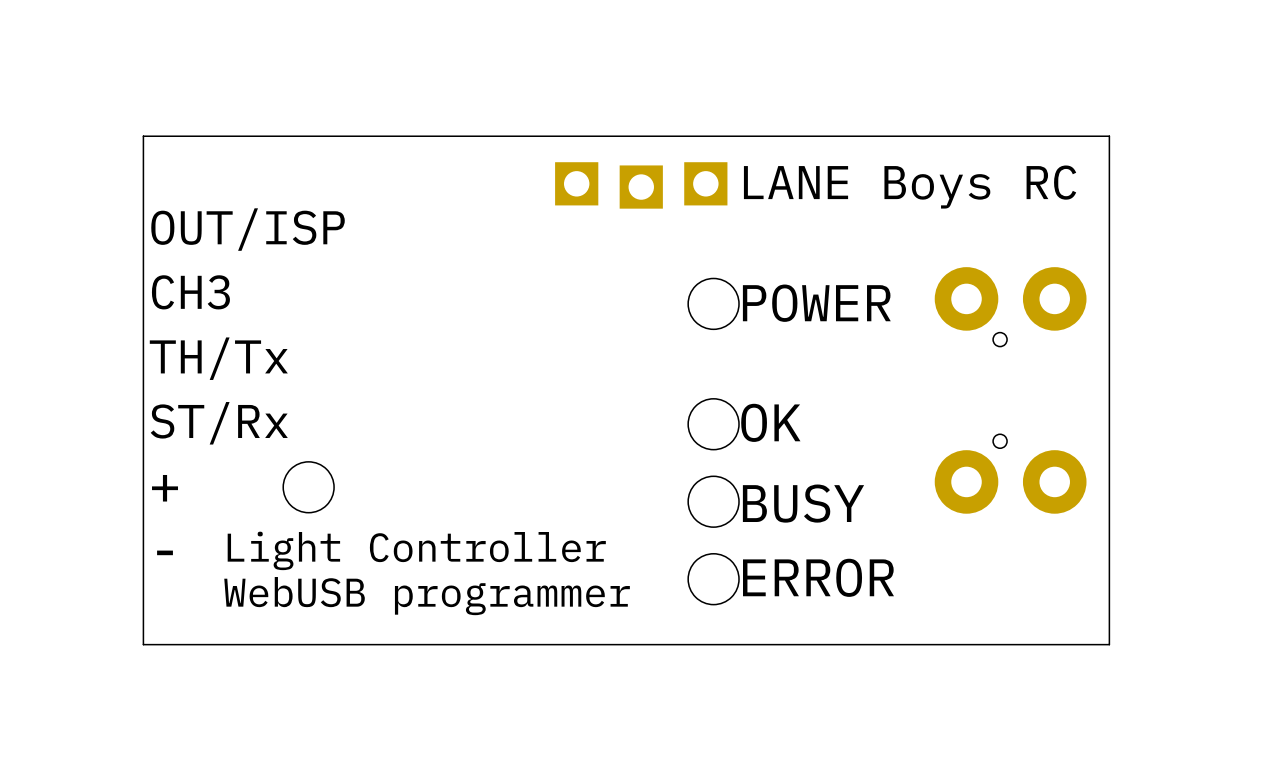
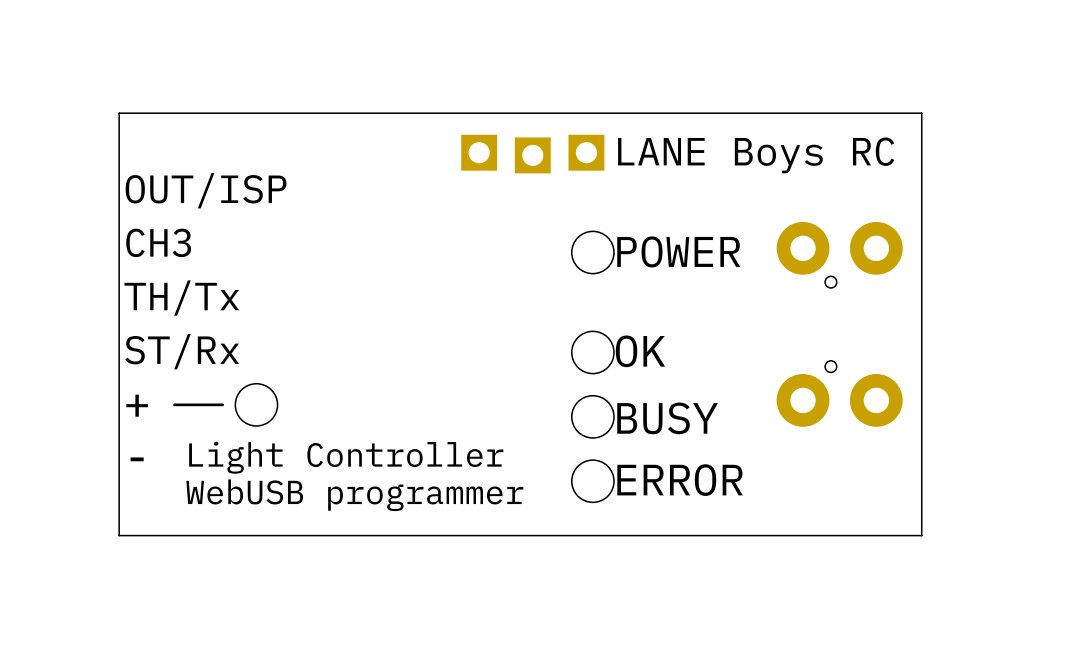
line: none -> (222, 404) (174, 404)

